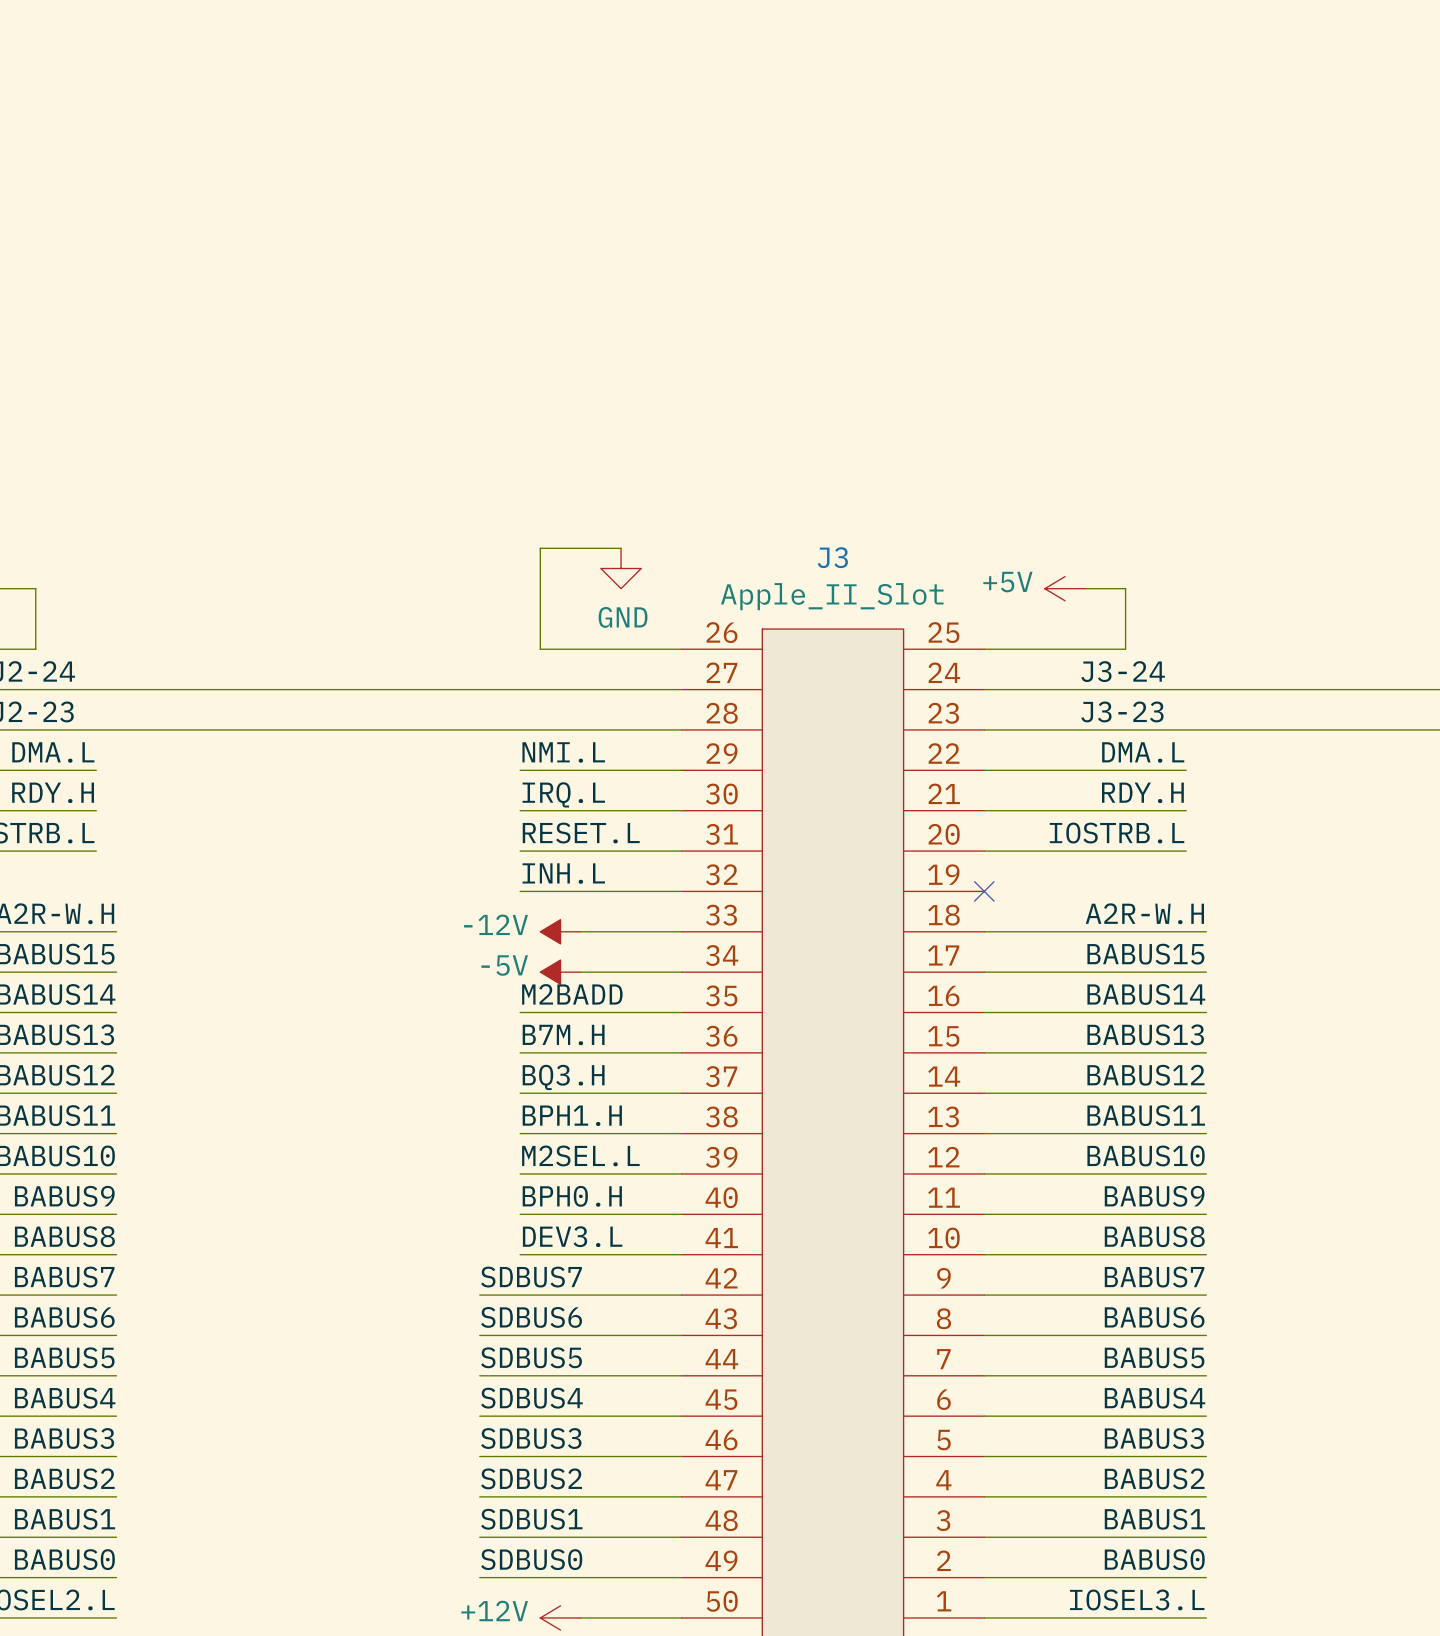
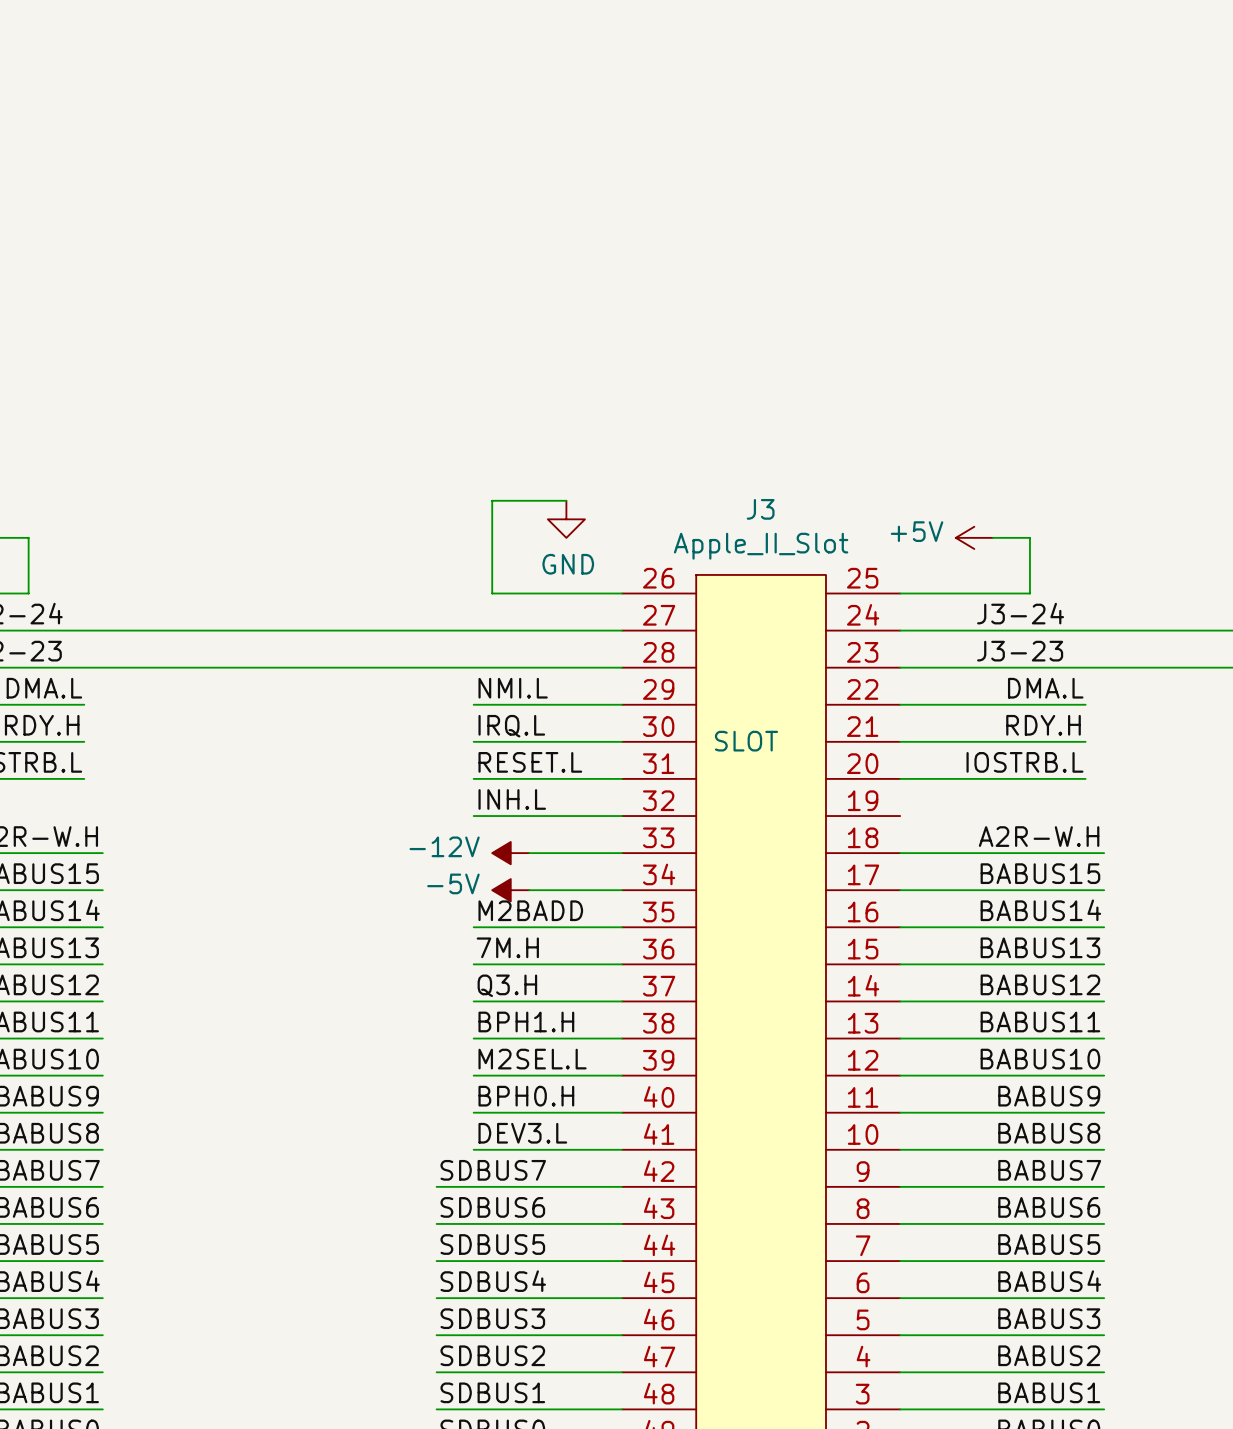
J3 pin name: none -> SLOT (746, 741)
no-connect mark: (984, 891) -> none
label: B7M.H (563, 1035) -> 7M.H (507, 947)
label: BQ3.H (563, 1077) -> Q3.H (507, 985)

